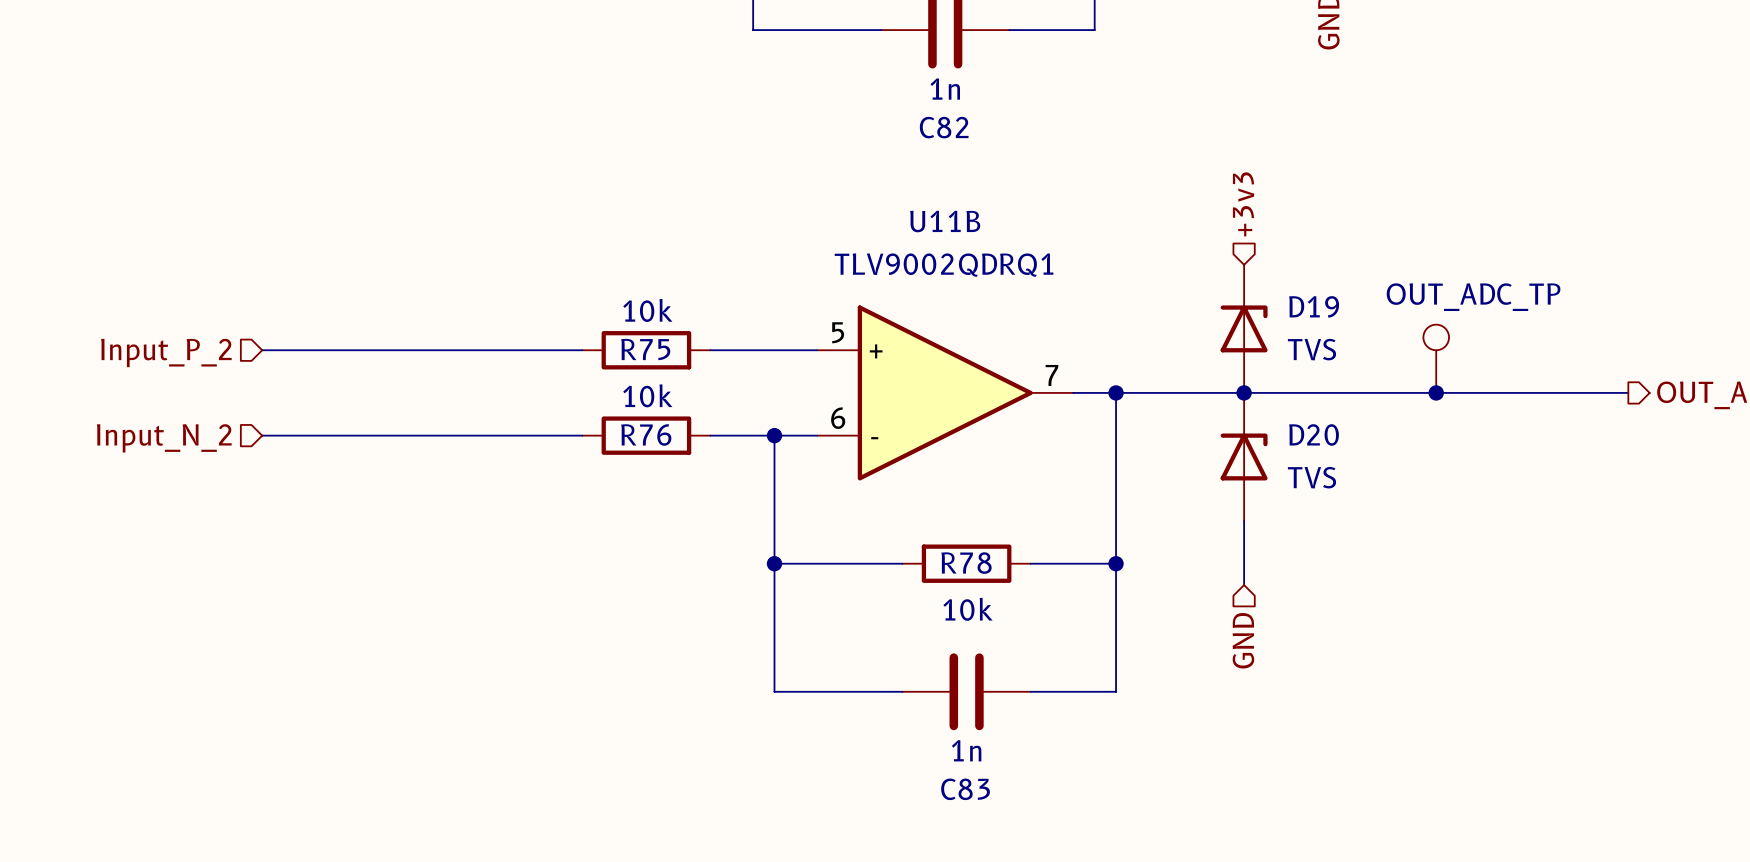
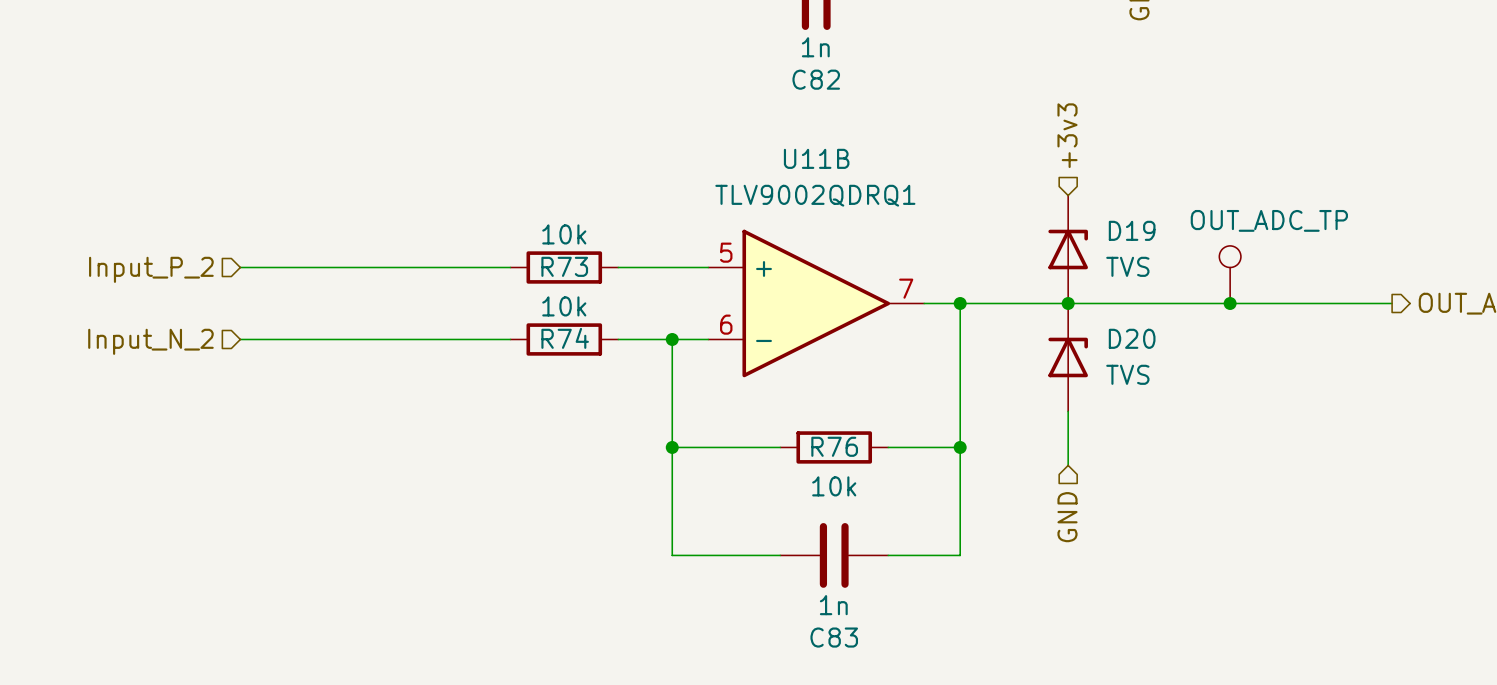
R75 name: R75 (645, 349) -> R73 (564, 266)
R76 name: R76 (646, 434) -> R74 (565, 338)
R78 name: R78 (966, 563) -> R76 (834, 446)

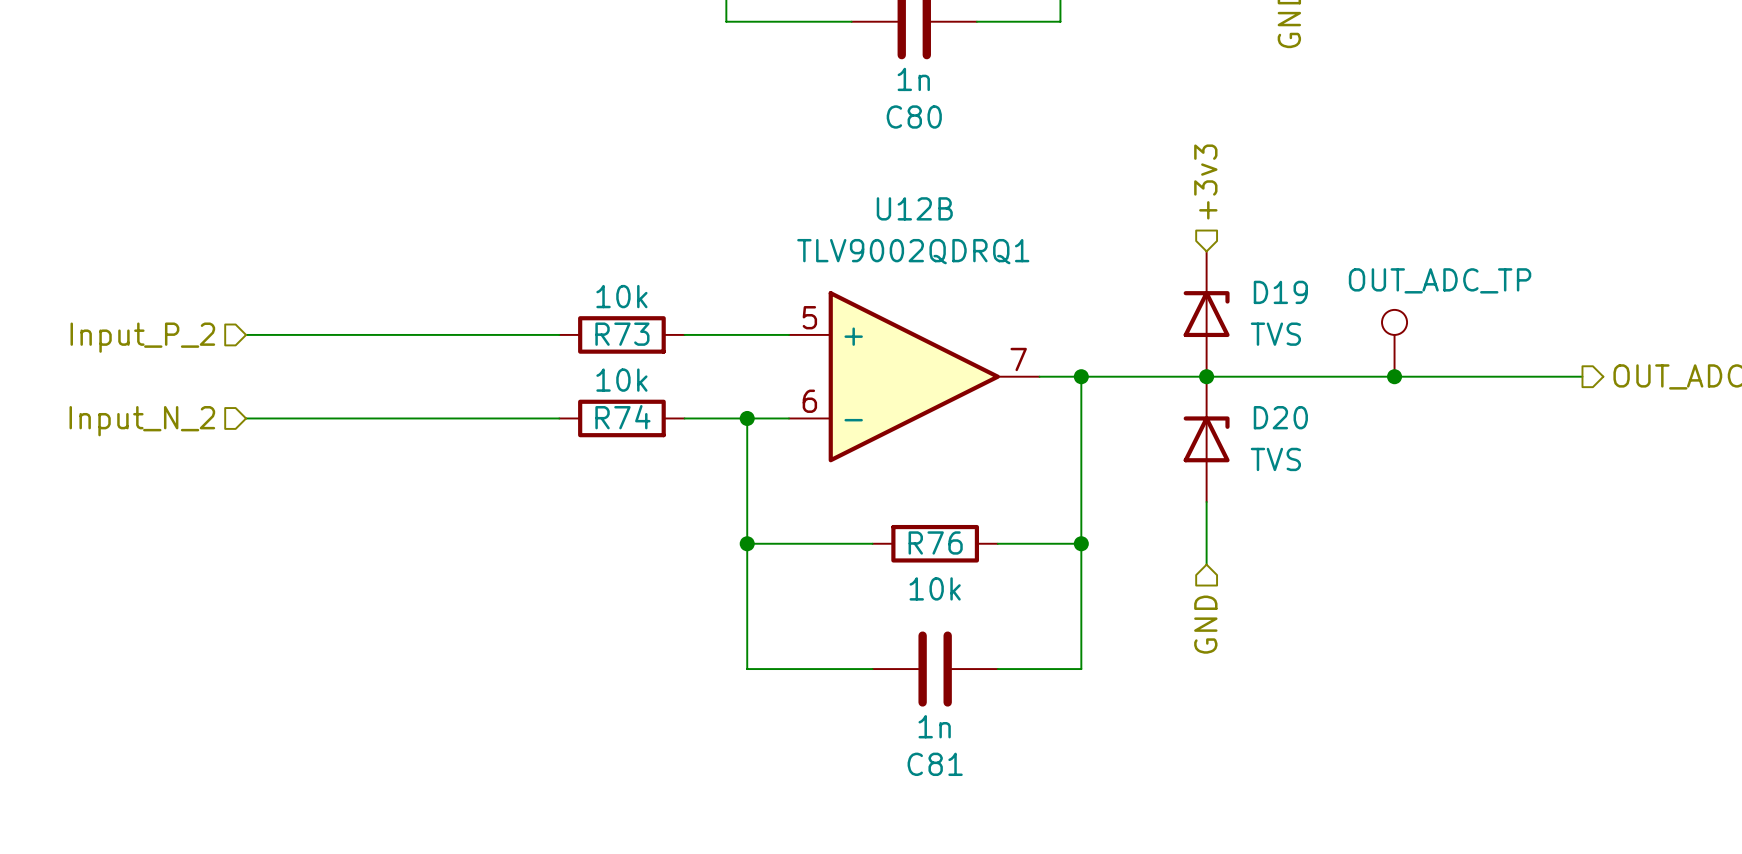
C82 name: C82 (816, 79) -> C80 (914, 117)
U11B name: U11B (816, 158) -> U12B (914, 208)
C83 name: C83 (834, 637) -> C81 (935, 764)

